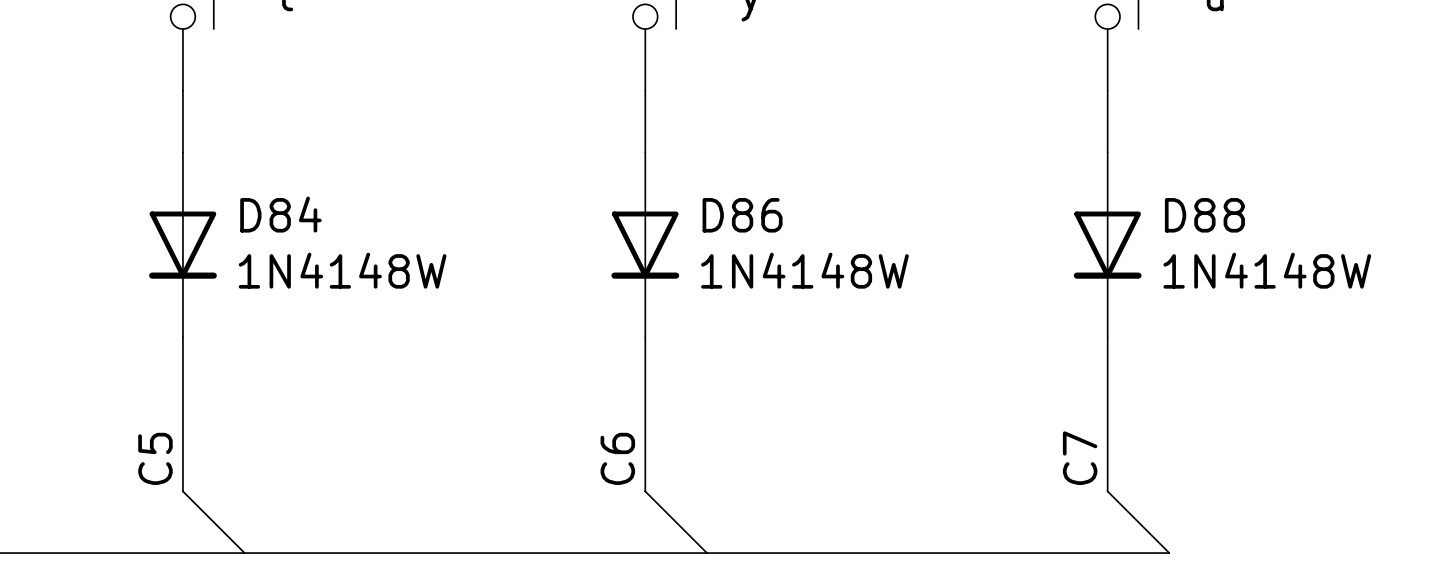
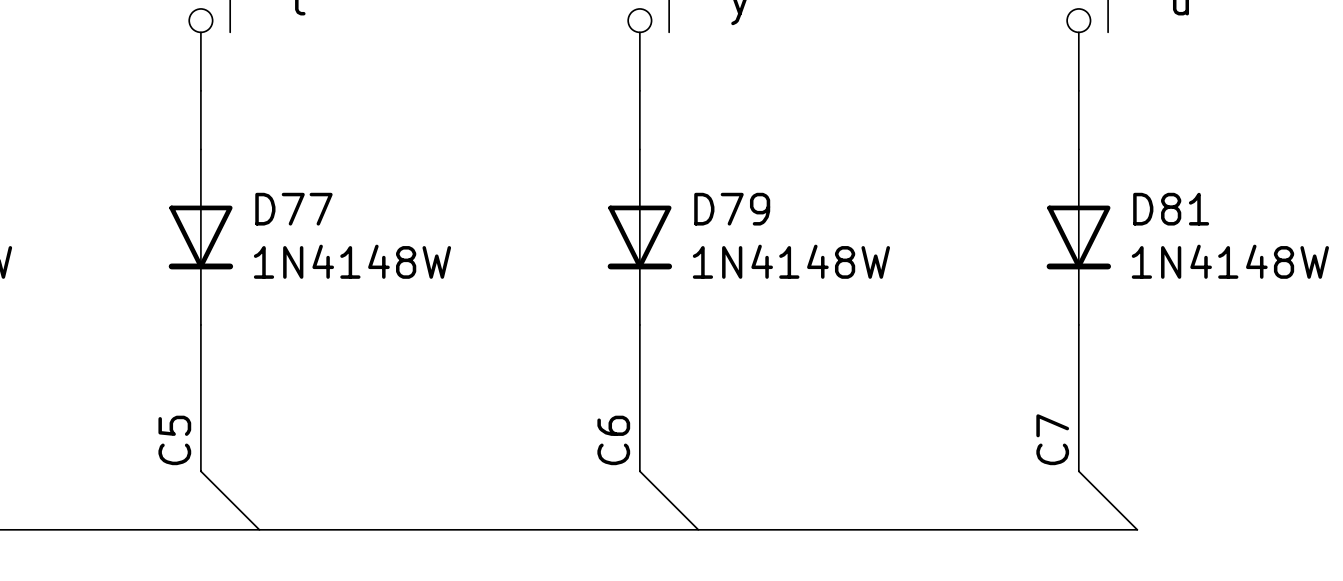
D84 name: D84 (280, 214) -> D77 (293, 209)
D86 name: D86 (742, 215) -> D79 (732, 209)
D88 name: D88 (1204, 215) -> D81 (1171, 209)

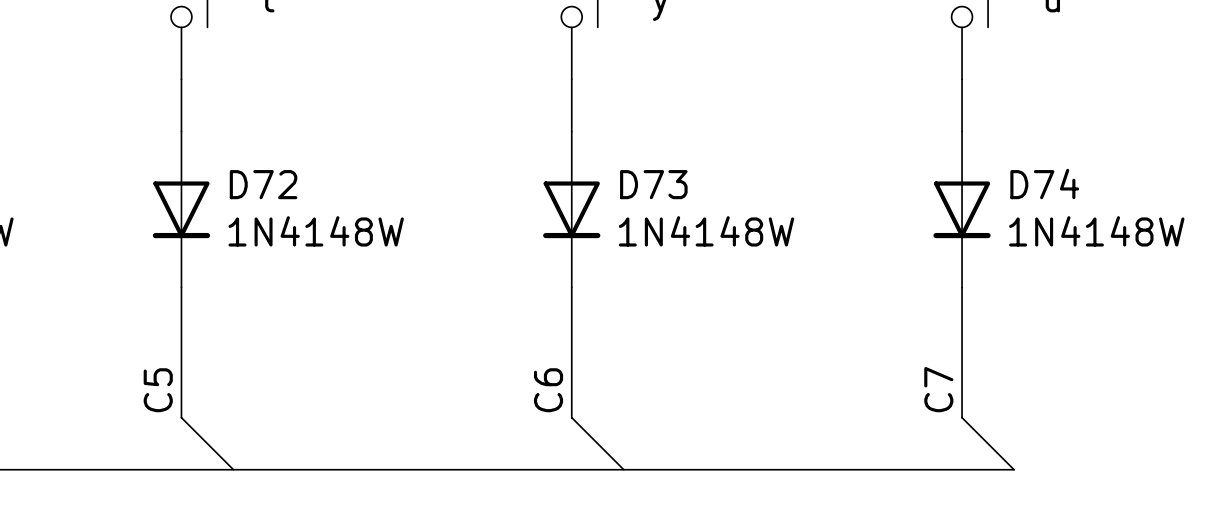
D77 name: D77 (293, 209) -> D72 (263, 184)
D79 name: D79 (732, 209) -> D73 (653, 184)
D81 name: D81 (1171, 209) -> D74 (1044, 184)

